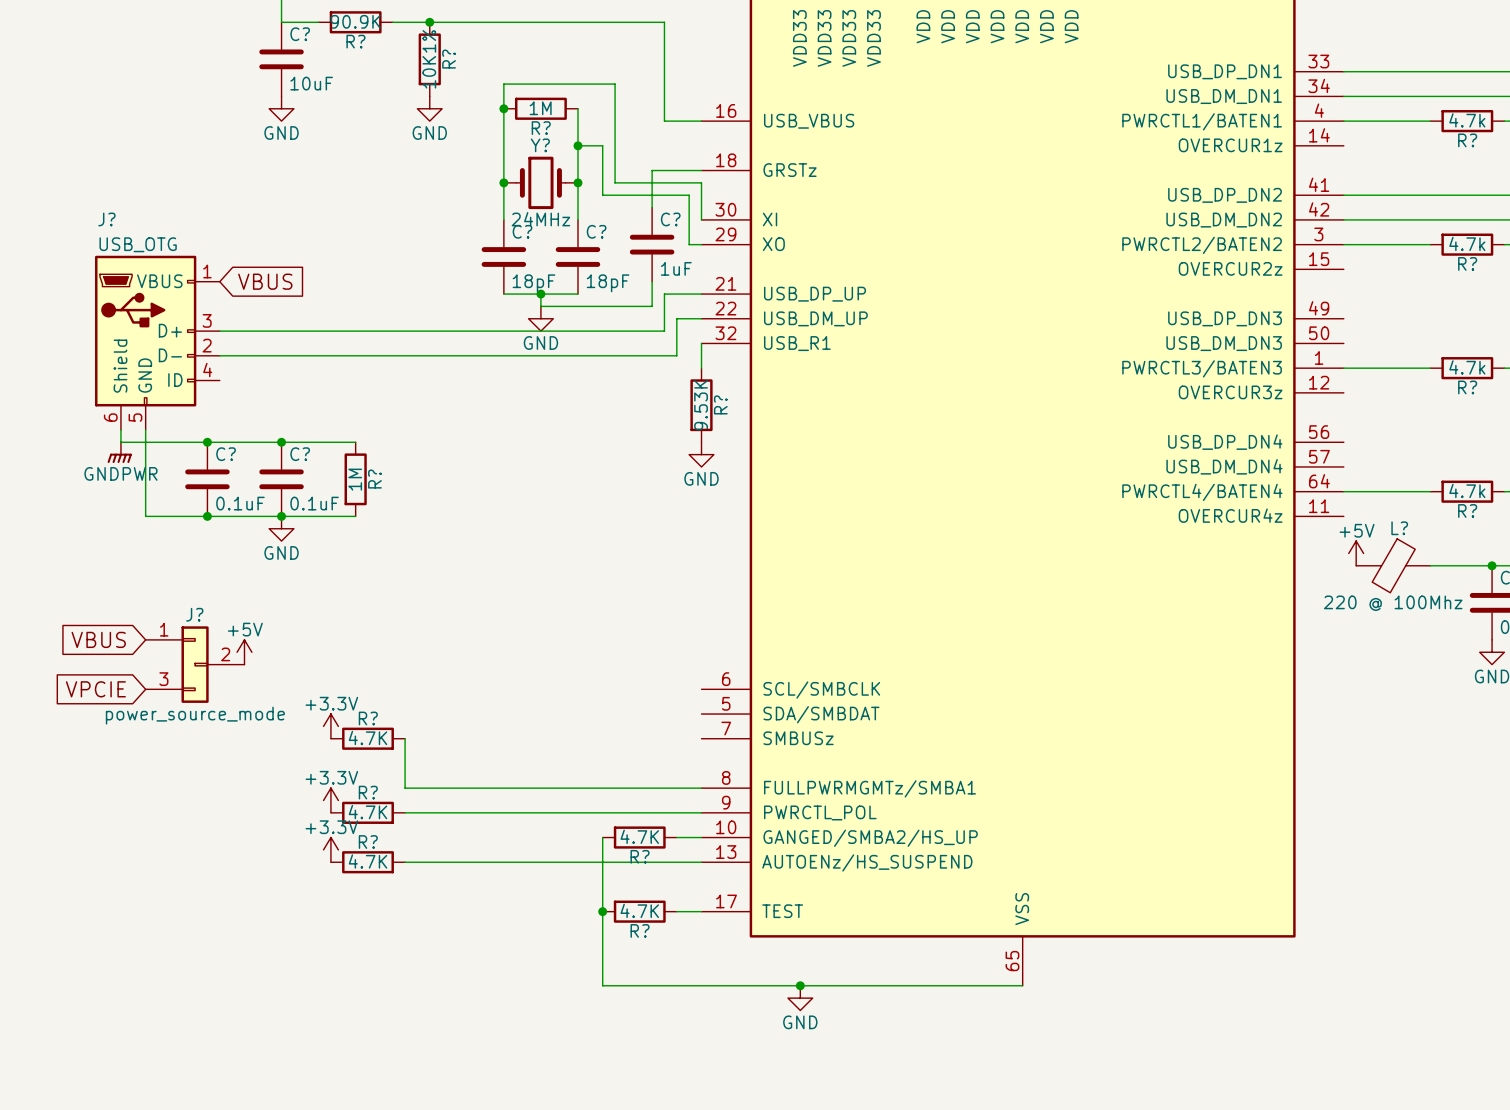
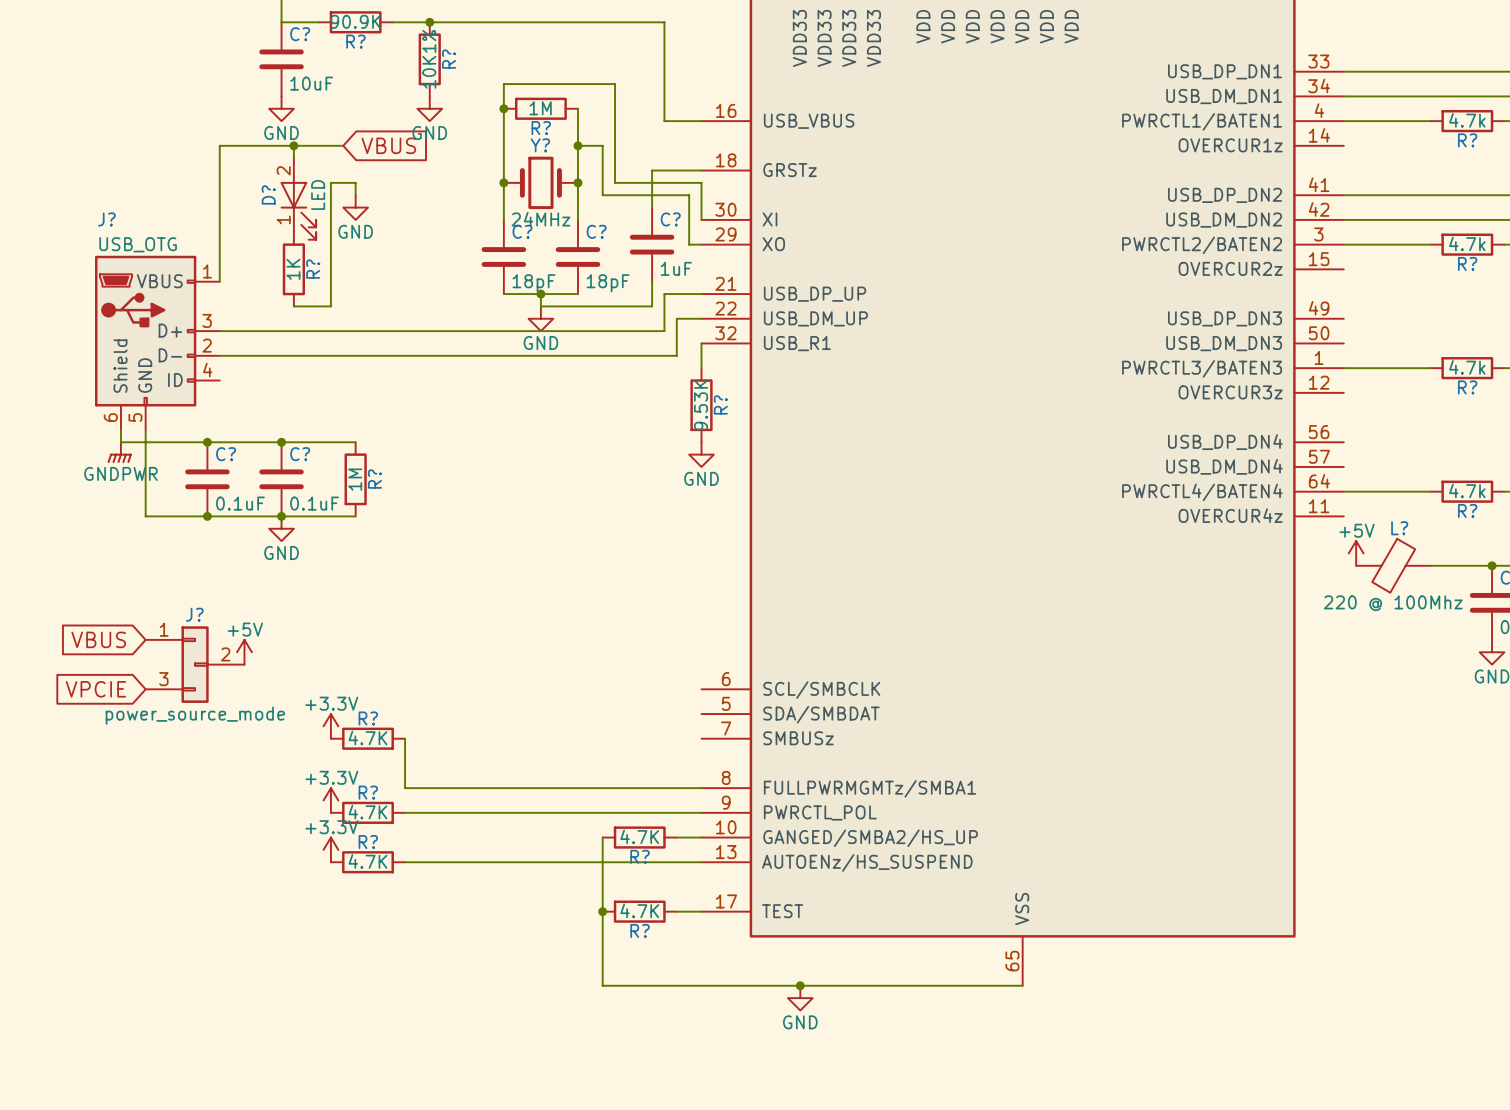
wire: none -> (293, 145) (293, 158)
junction: none -> (293, 145)
wire: none -> (343, 145) (219, 145) (219, 281)
wire: none -> (355, 195) (355, 182) (330, 182) (330, 306) (293, 306)
D?: none -> LED (298, 198)
power symbol: none -> GND (355, 207)
R?: none -> 1K (293, 269)
global label position: VBUS (265, 281) -> VBUS (388, 145)

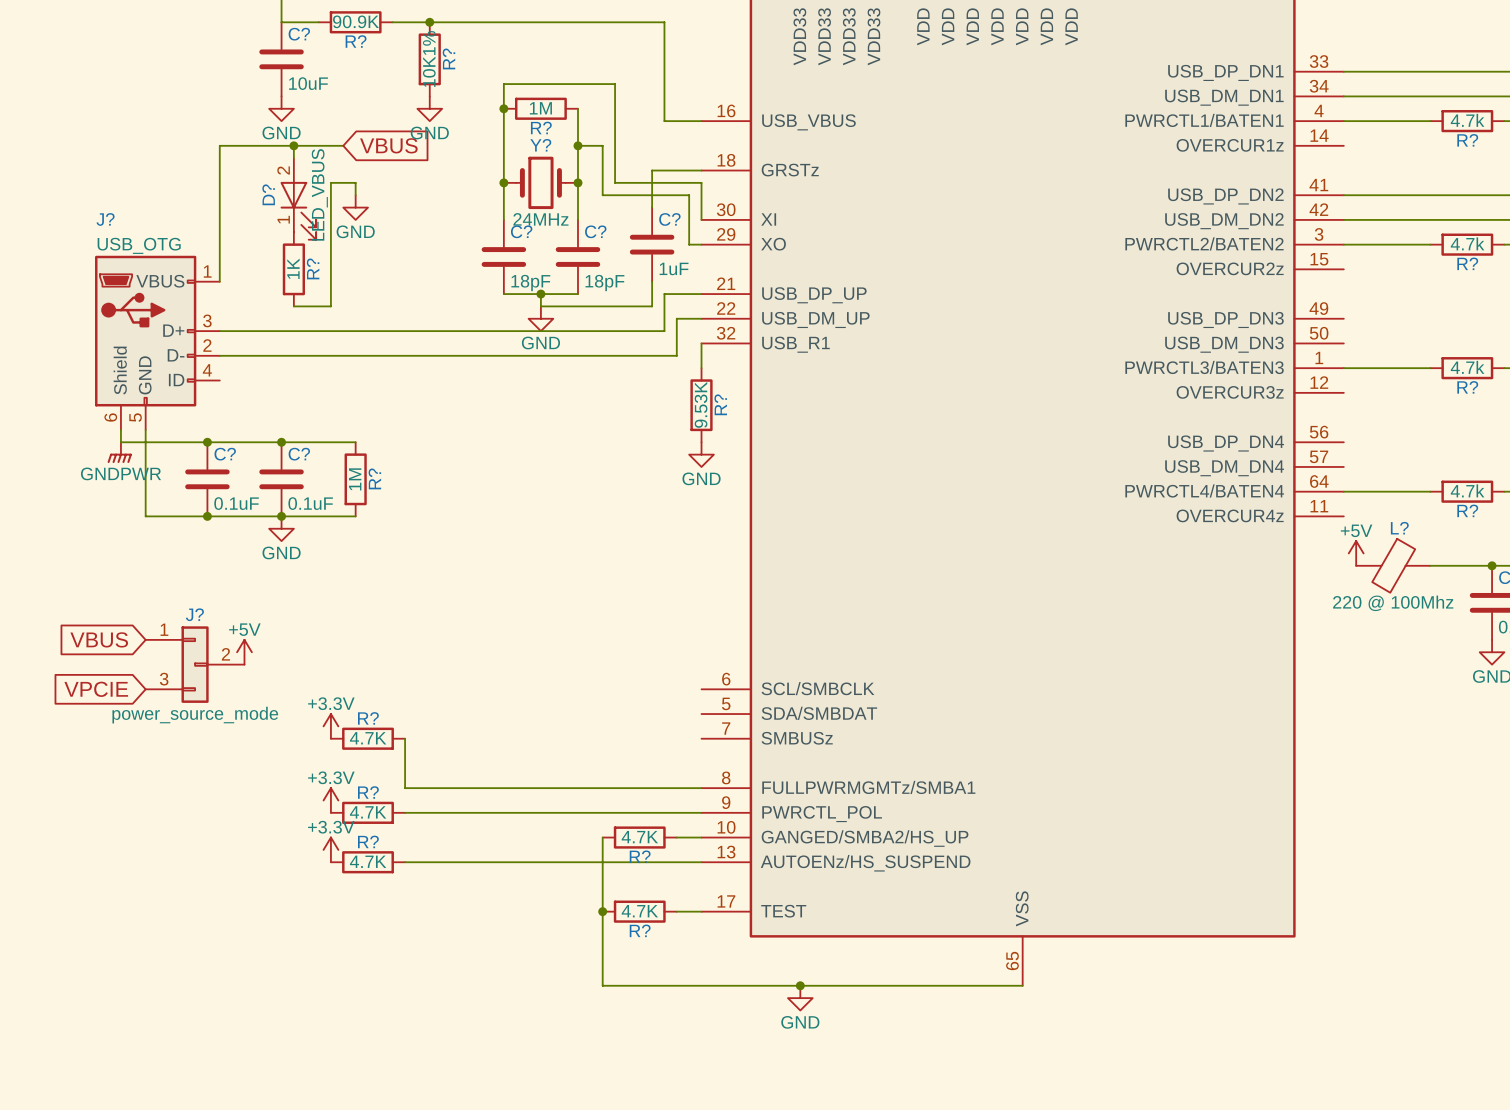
D? value: LED (318, 194) -> LED_VBUS (319, 194)

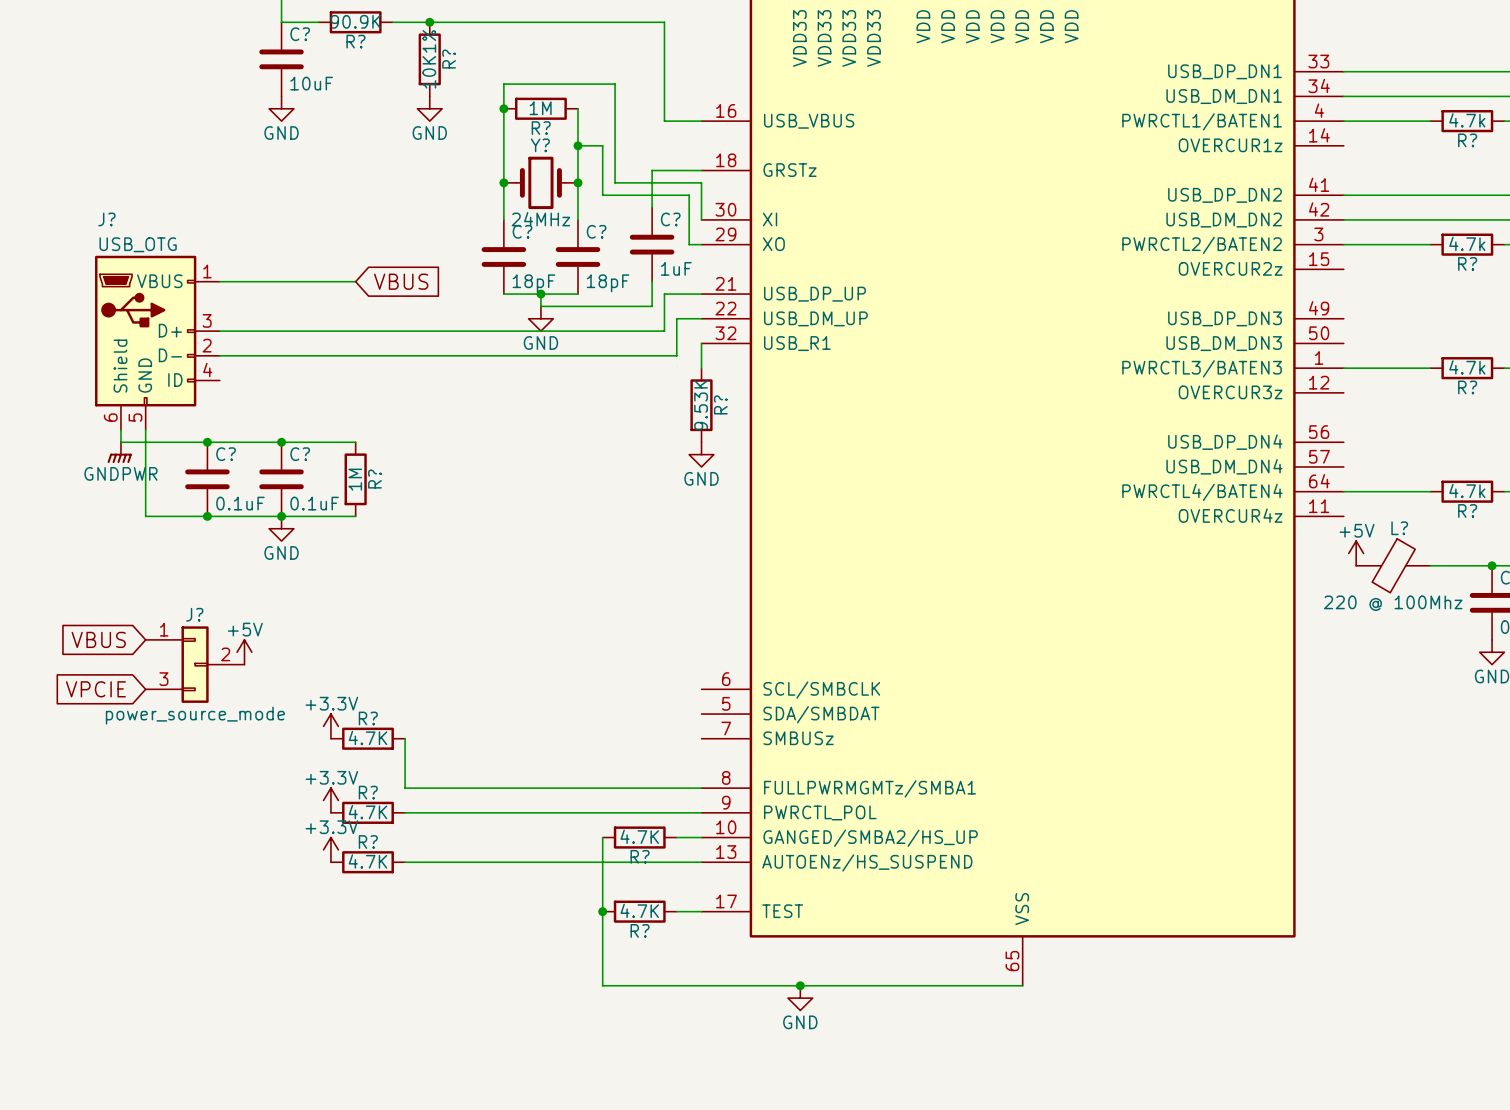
wire: (293, 145) (293, 158) -> none
junction: (293, 145) -> none
wire: (343, 145) (219, 145) (219, 281) -> (355, 281) (219, 281)
global label position: VBUS (388, 145) -> VBUS (401, 281)
wire: (355, 195) (355, 182) (330, 182) (330, 306) (293, 306) -> none
D?: LED_VBUS (298, 198) -> none
power symbol: GND (355, 207) -> none
R?: 1K (293, 269) -> none

